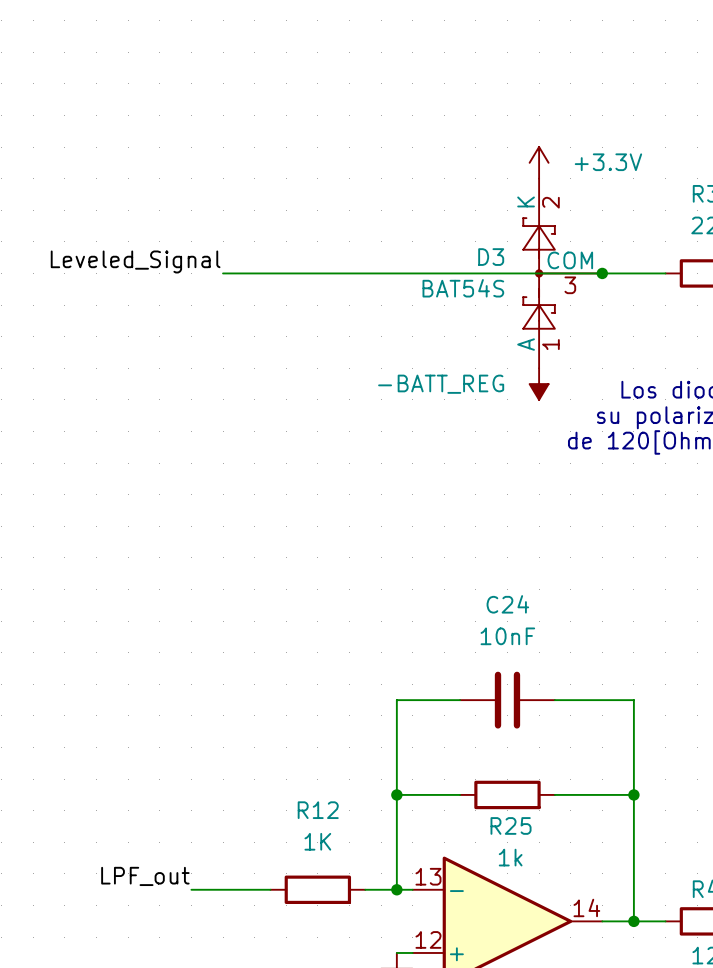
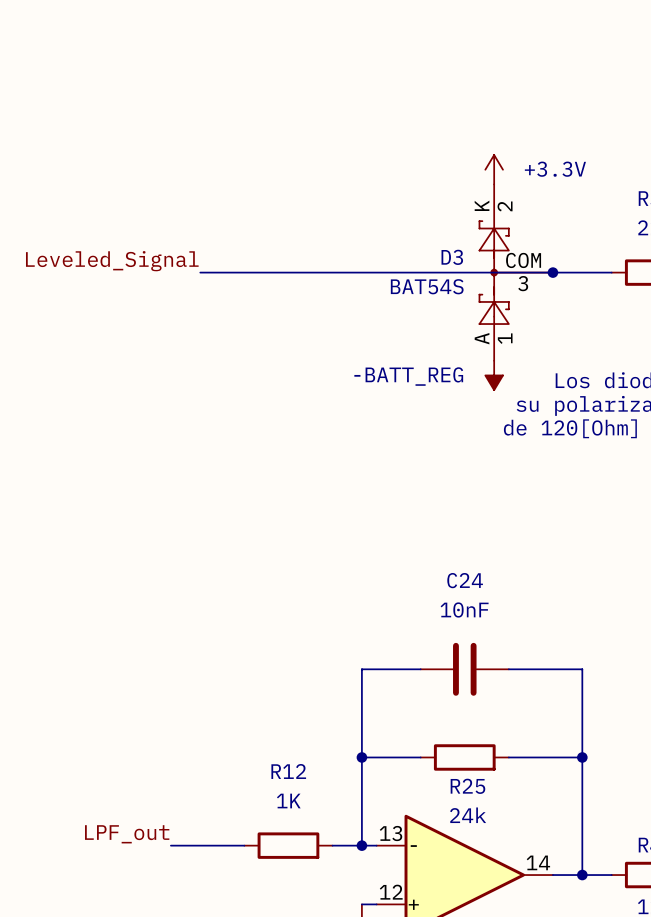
R25 value: 1k (510, 857) -> 24k (468, 815)

